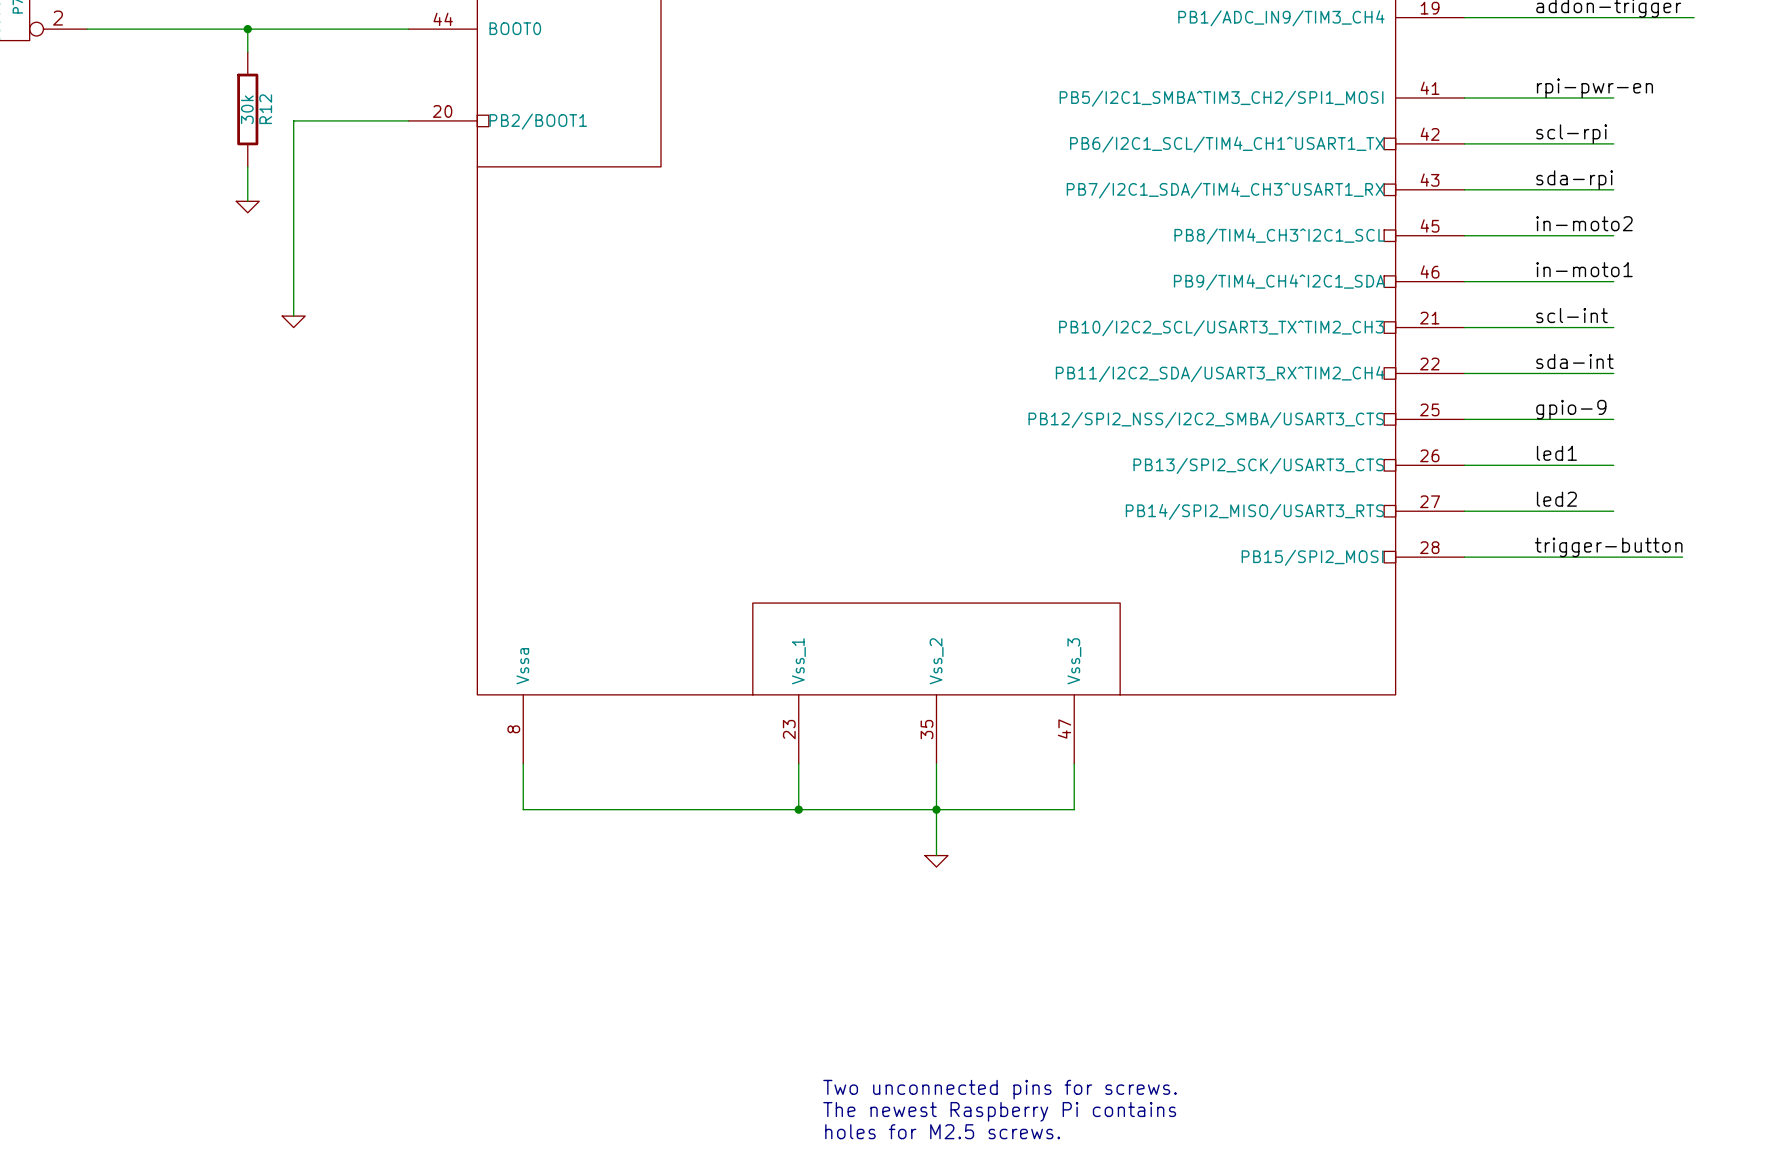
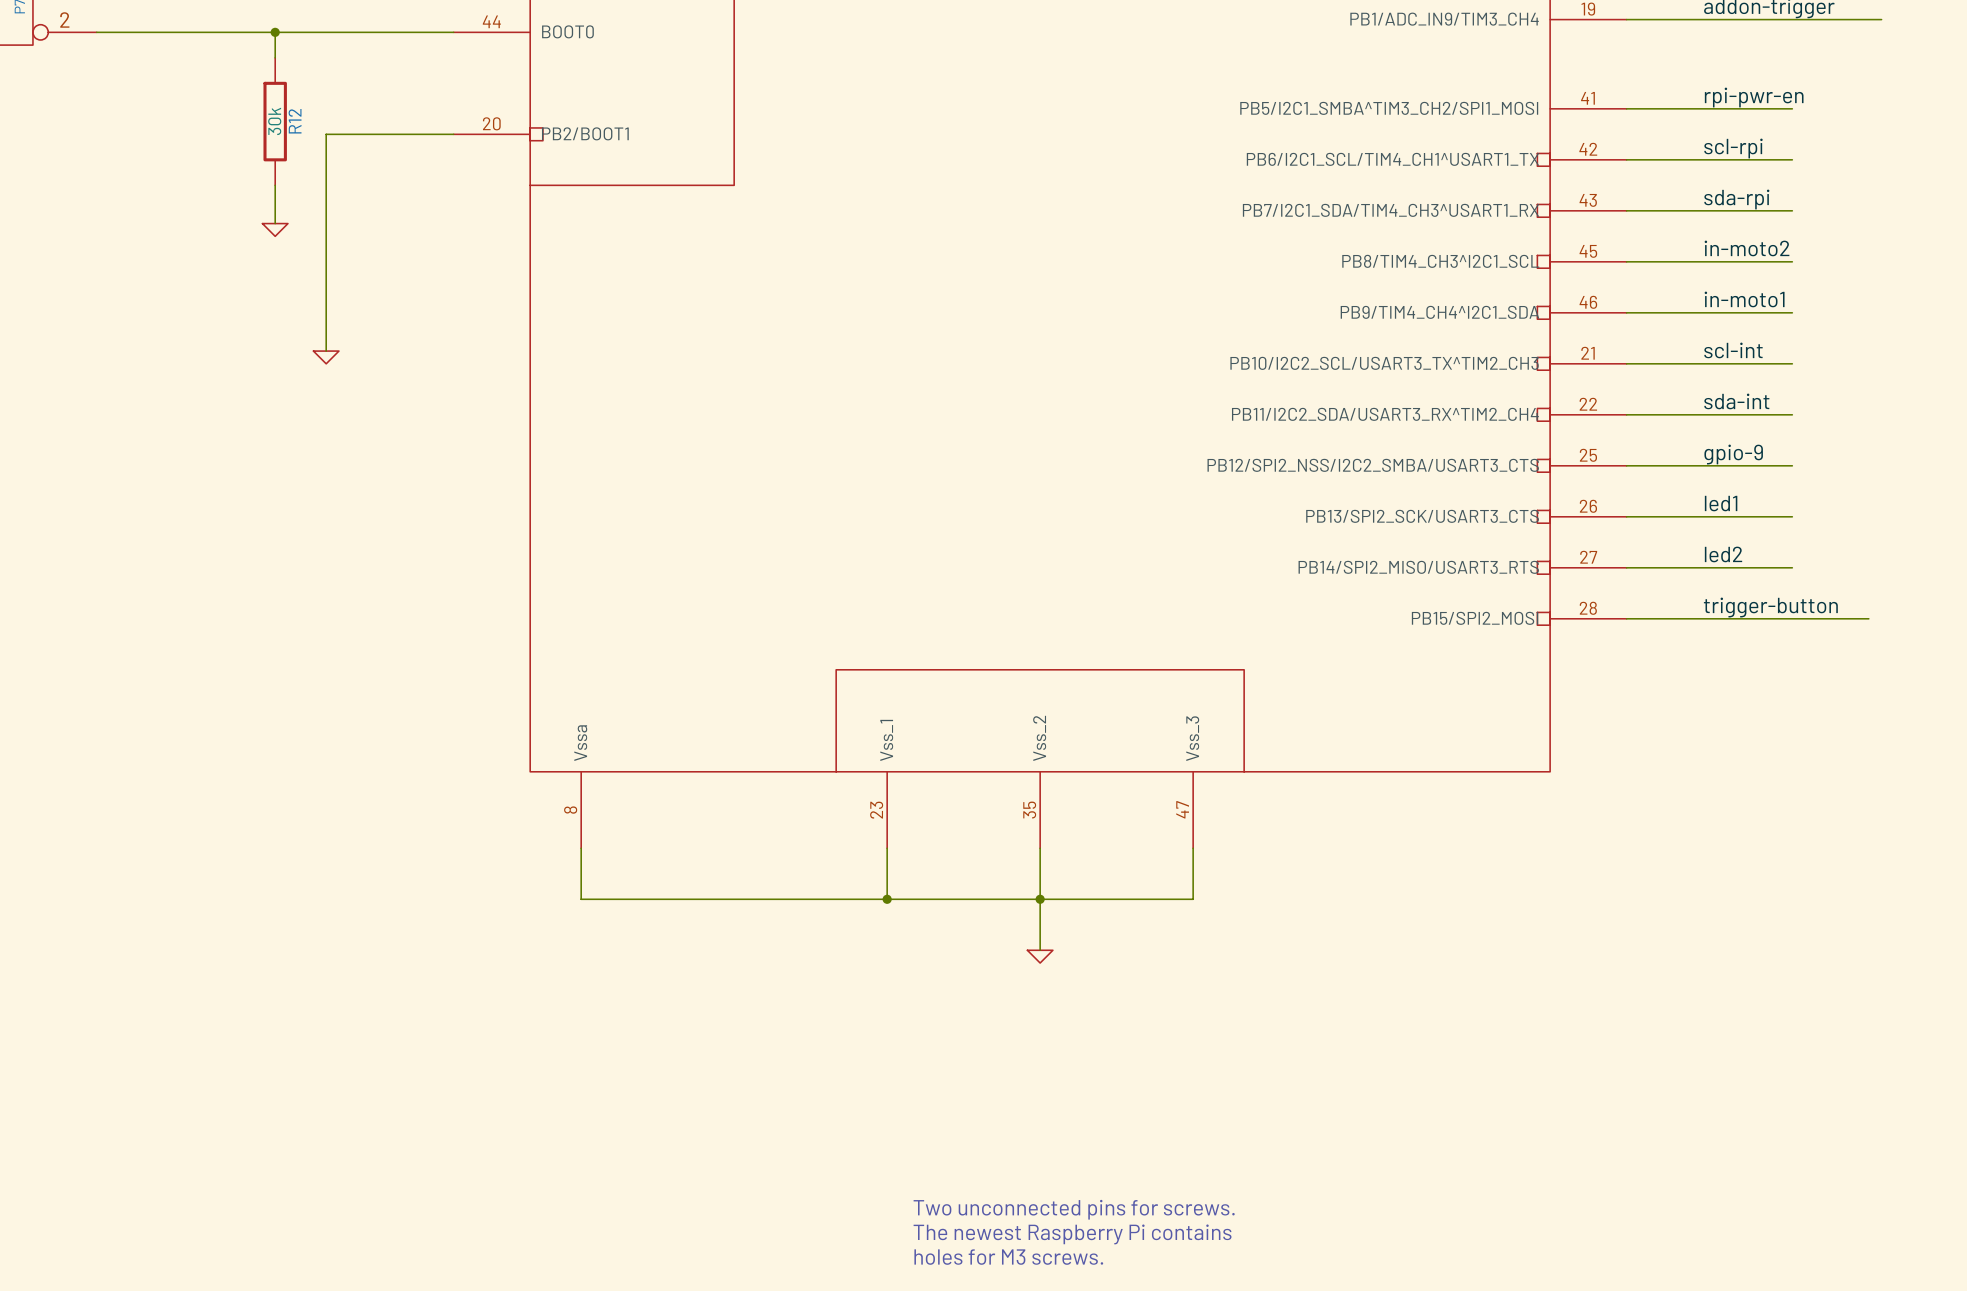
text: holes for M2.5 screws. (942, 1131) -> holes for M3 screws. (1008, 1257)

